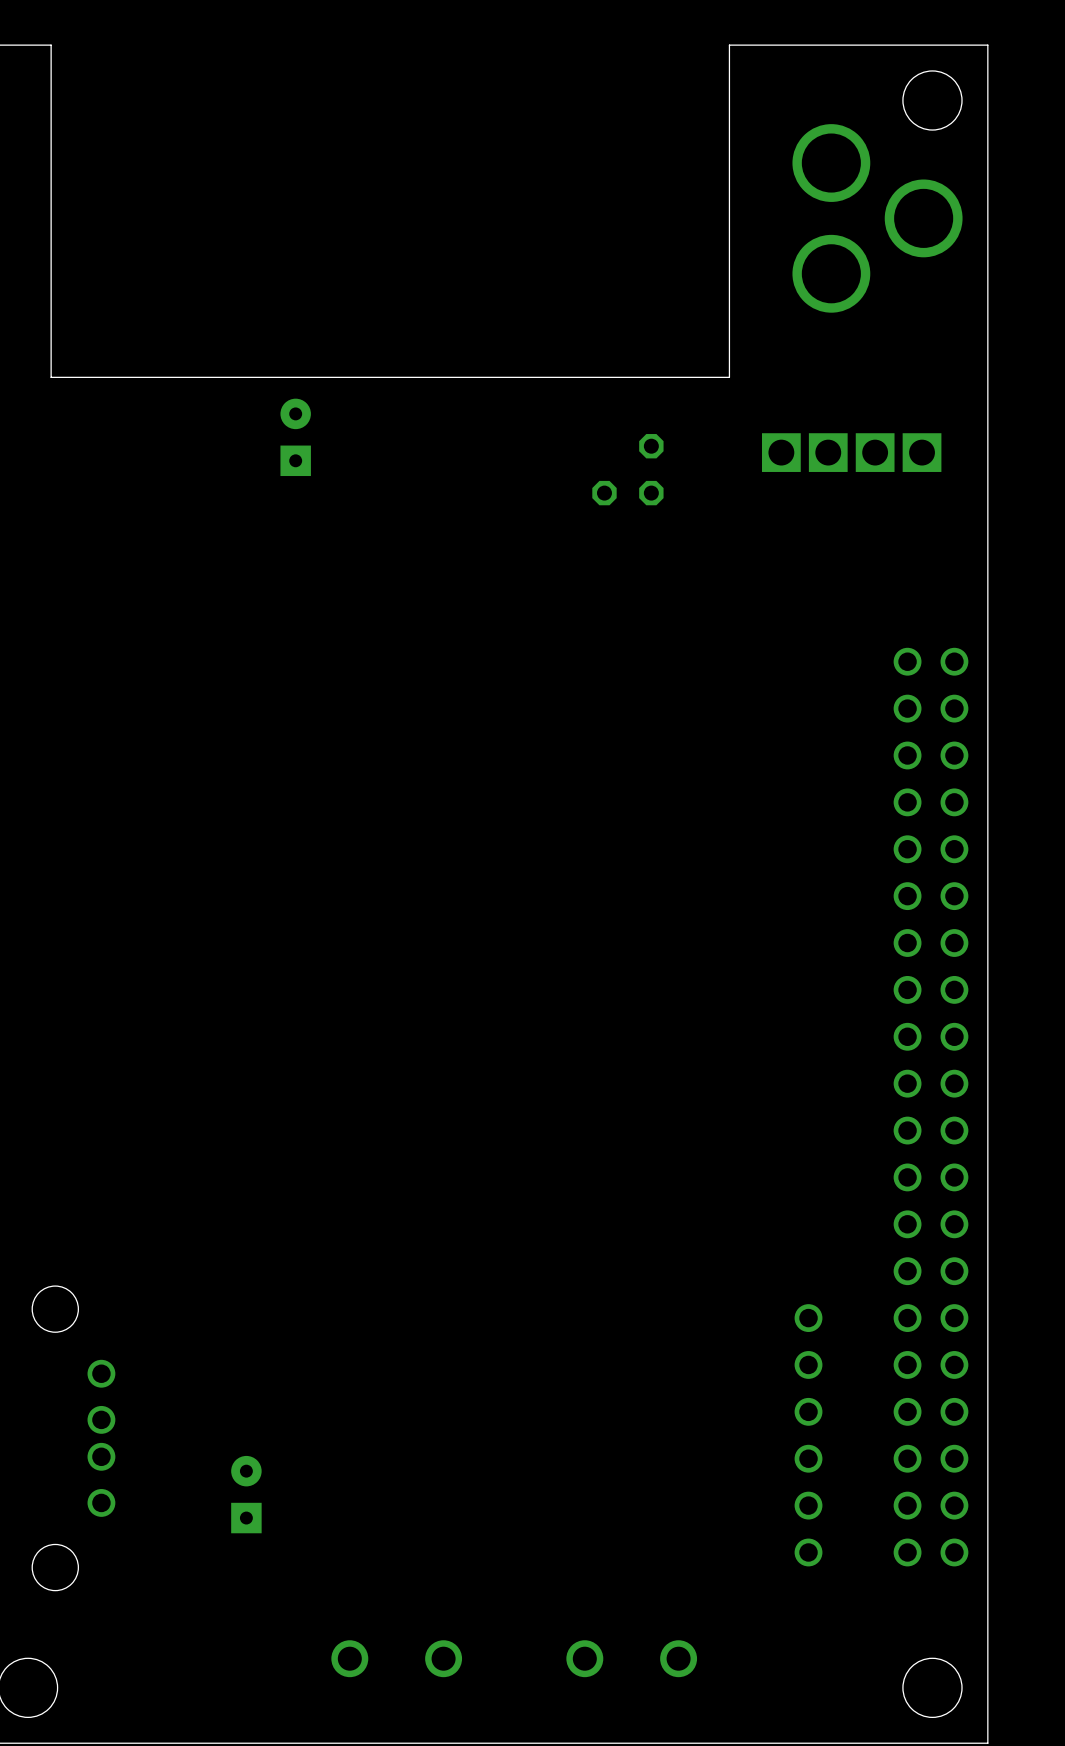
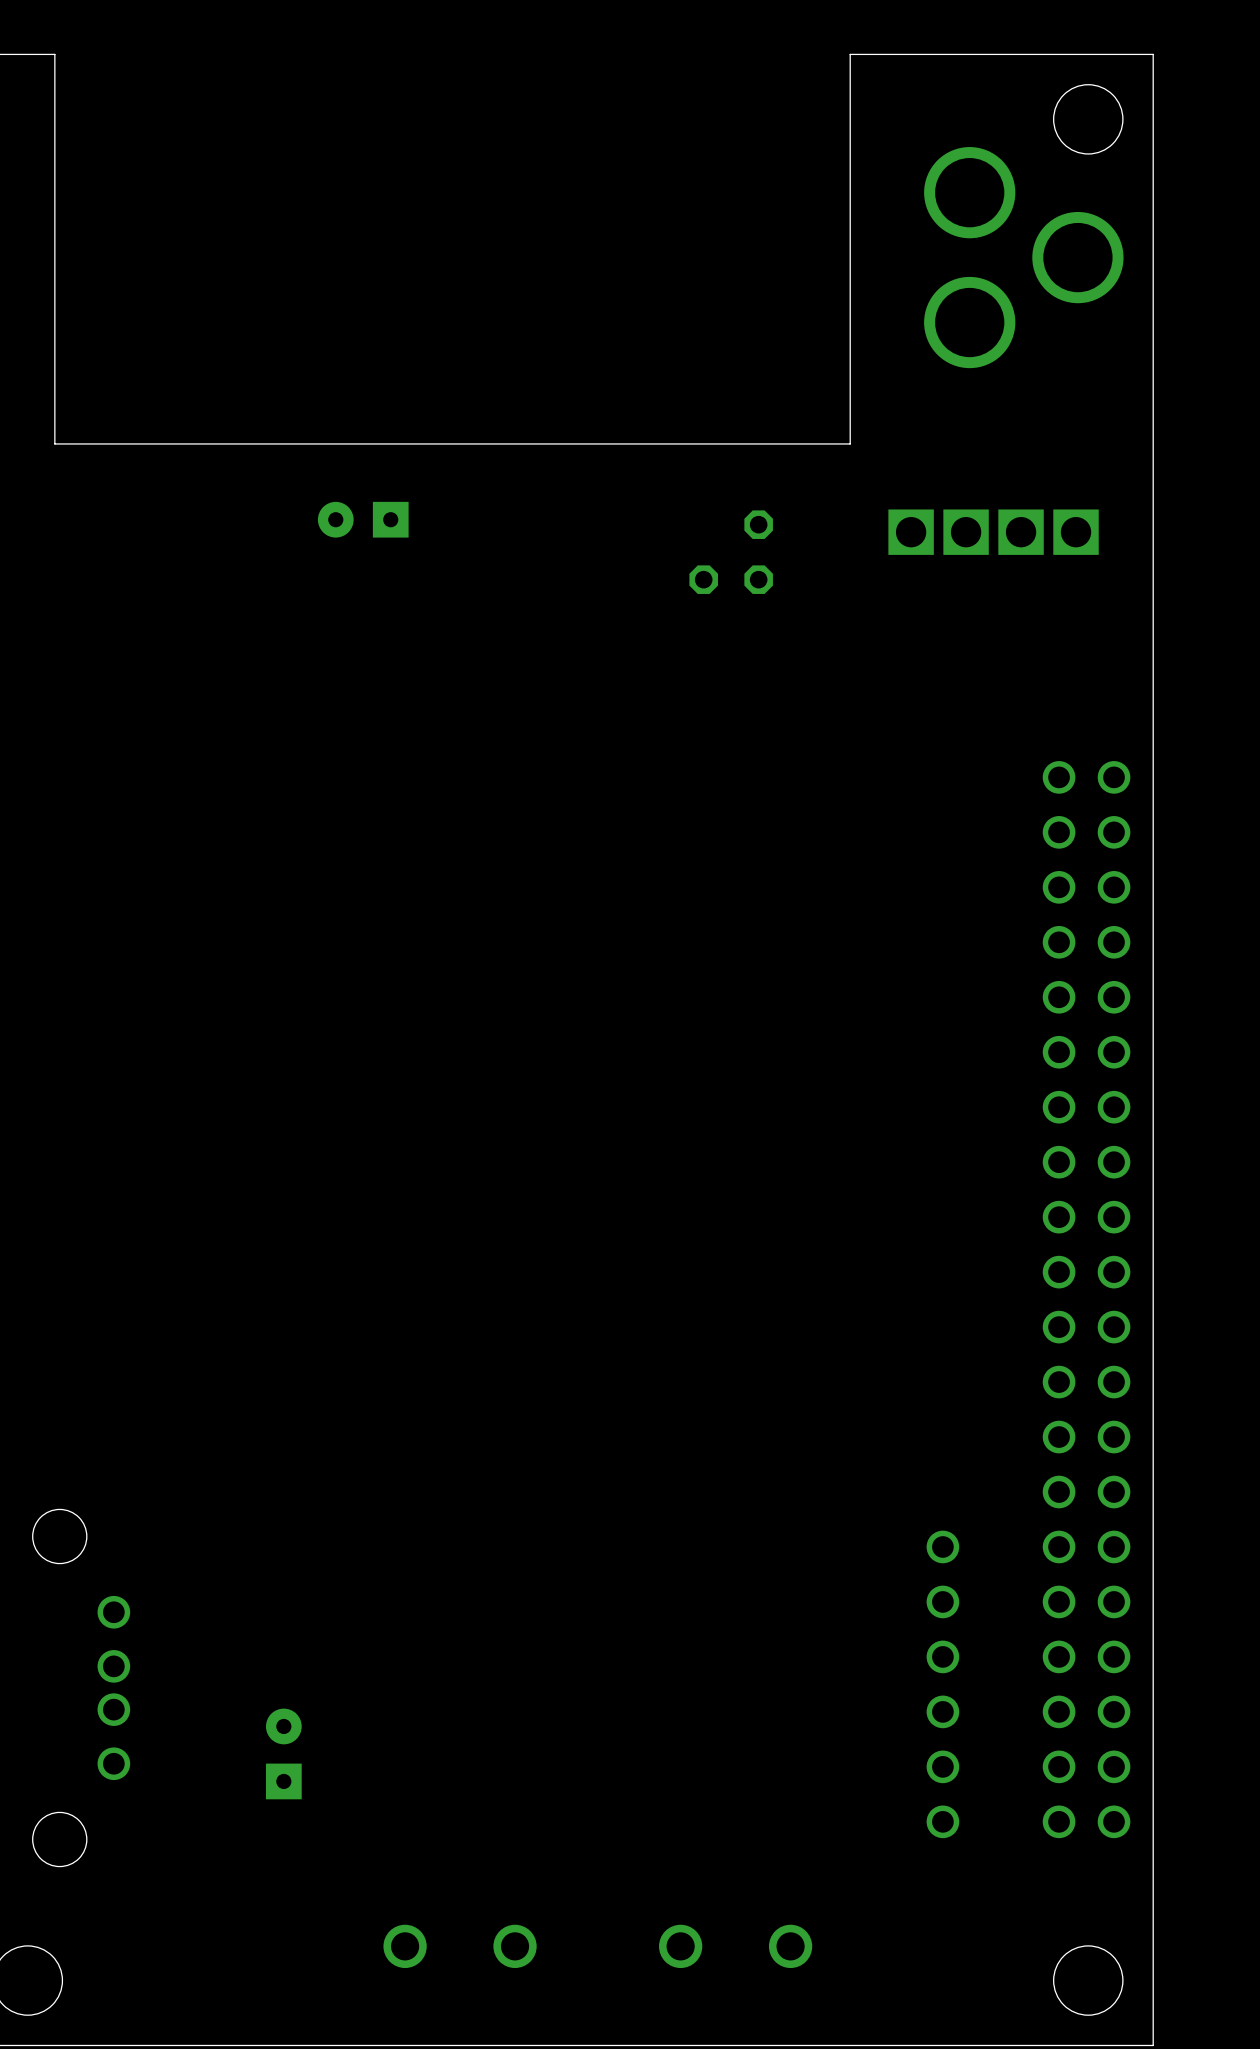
part rotation: 0° (295, 437) -> 90° counterclockwise (363, 519)

